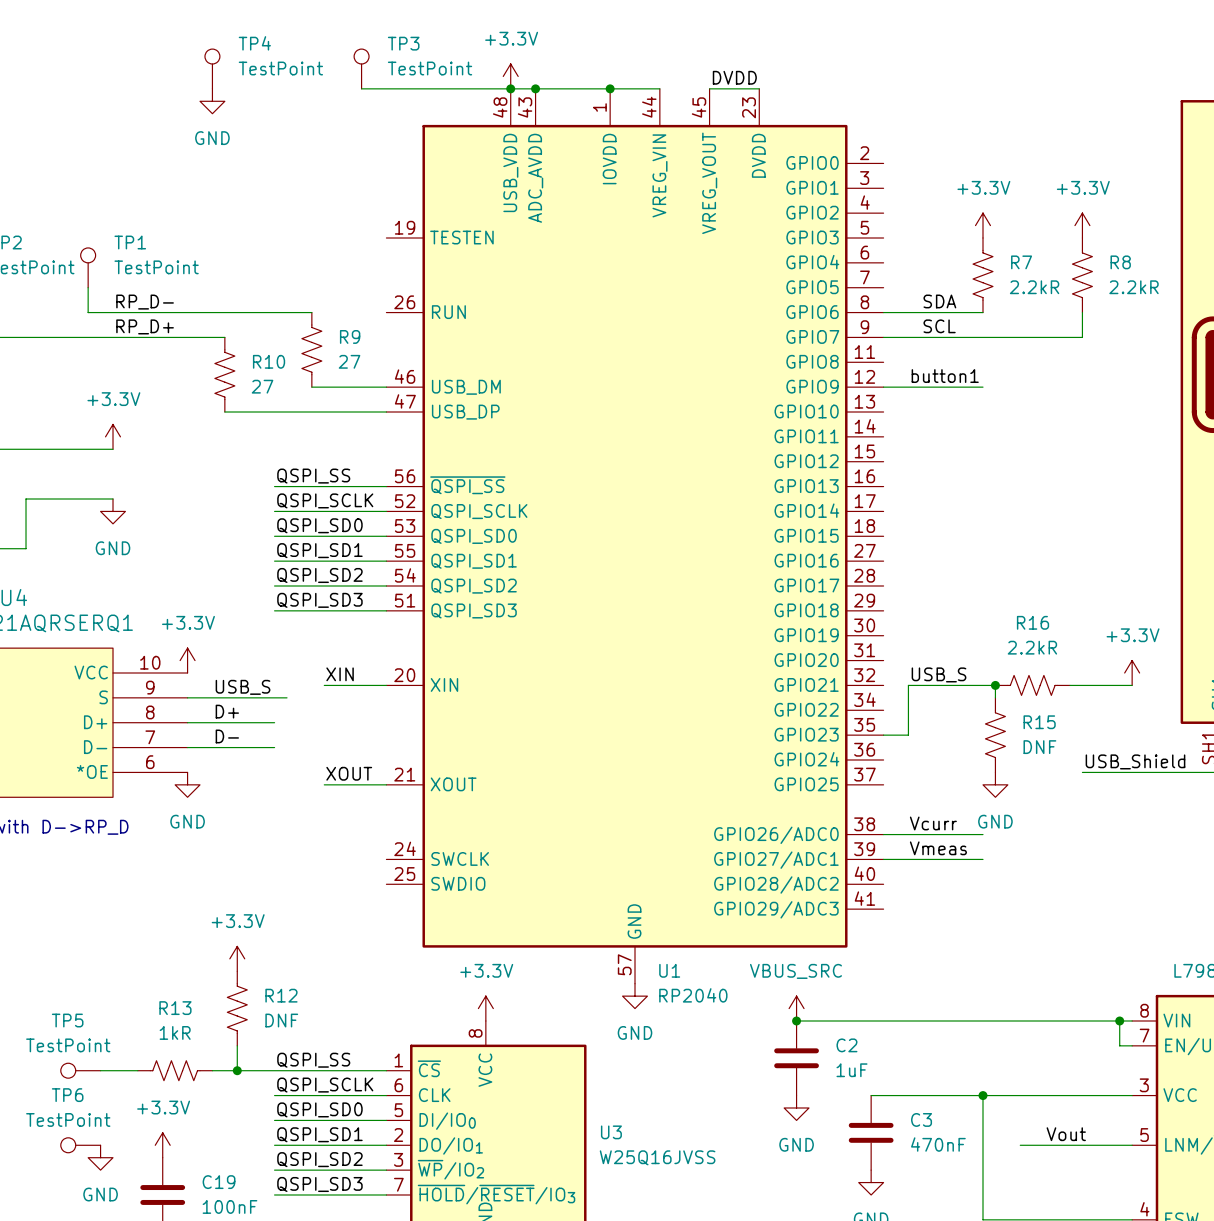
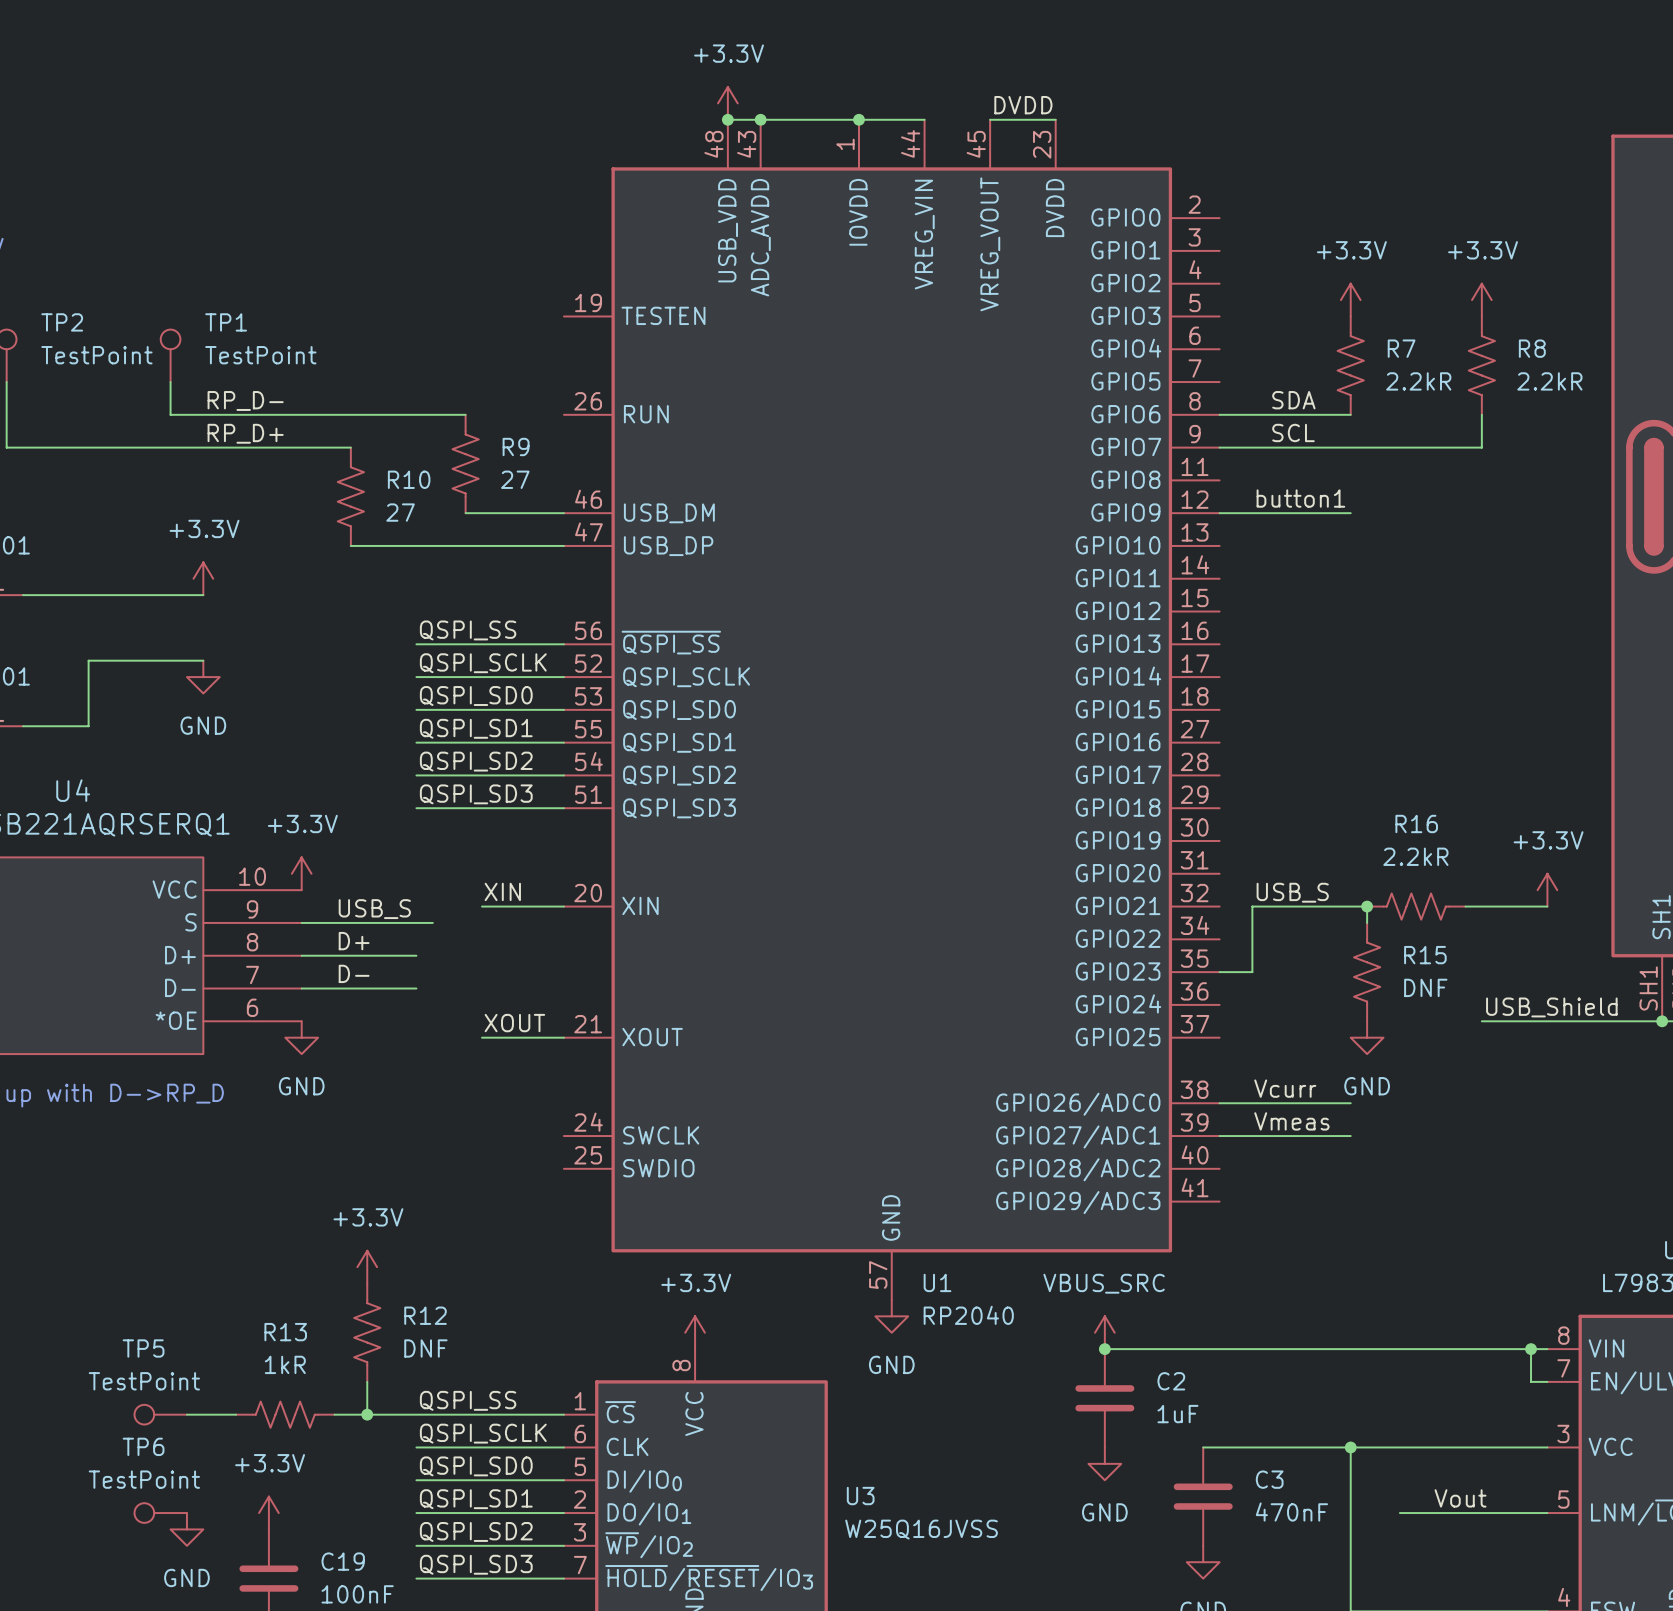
TP4: TestPoint (212, 68) -> none
TP3: TestPoint (361, 68) -> none
wire: (361, 88) (510, 88) -> none
power symbol: GND (212, 101) -> none

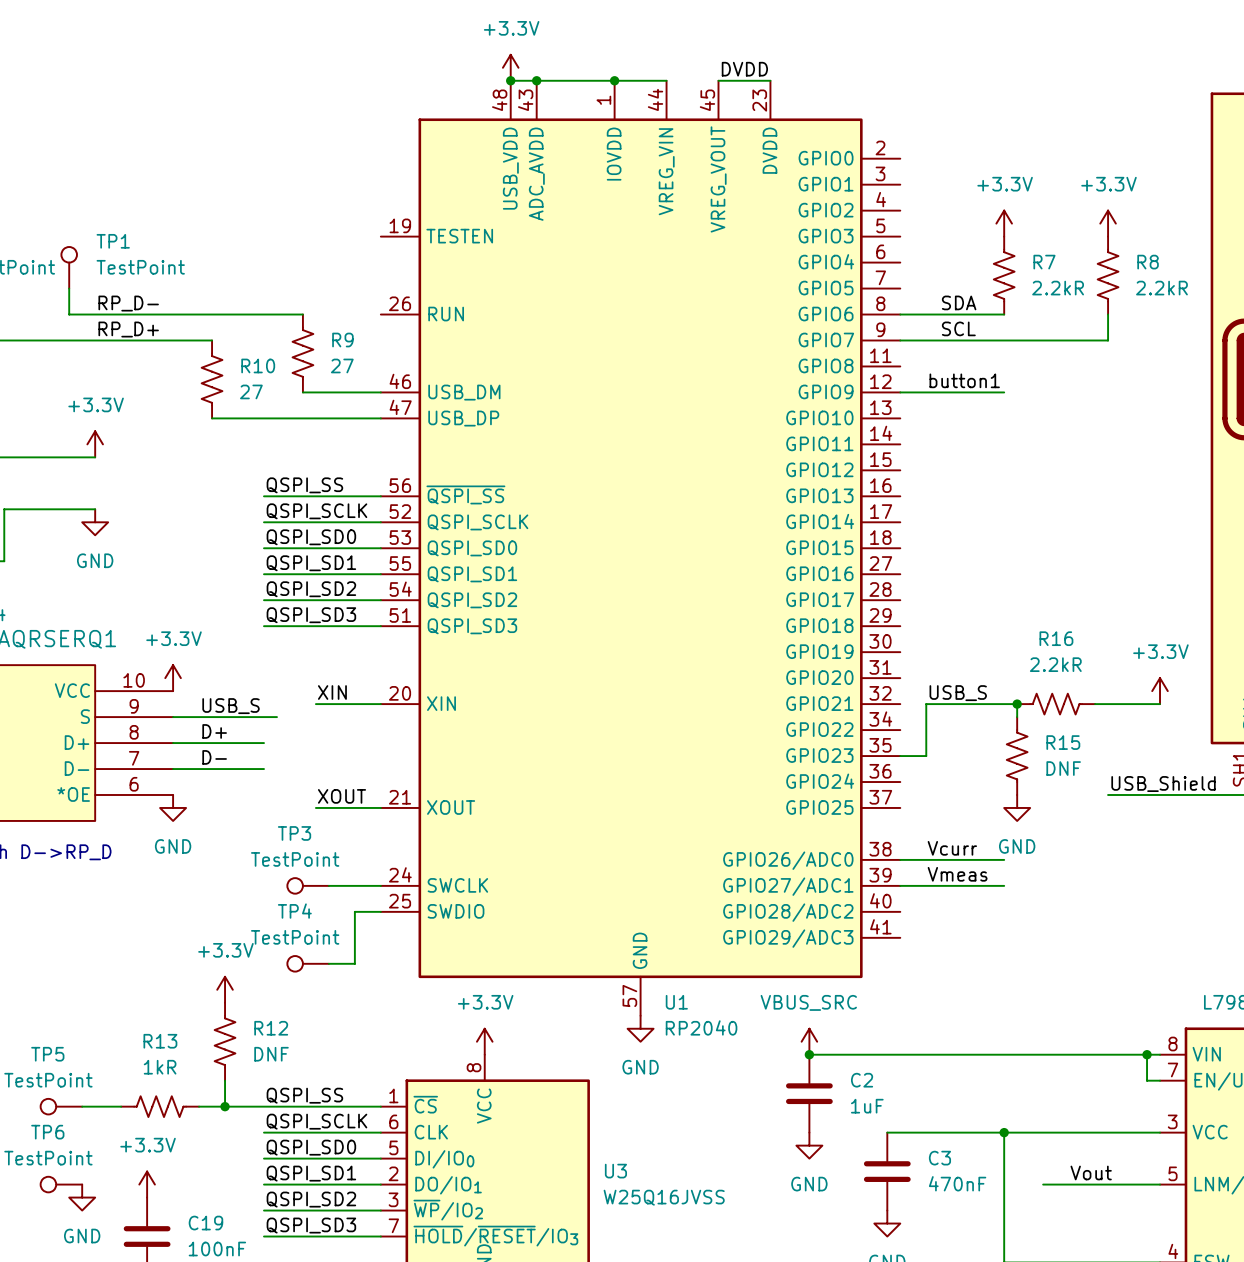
TP3: none -> TestPoint (308, 885)
wire: none -> (328, 885) (380, 885)
wire: none -> (380, 911) (354, 911) (354, 963) (328, 963)
TP4: none -> TestPoint (308, 963)

